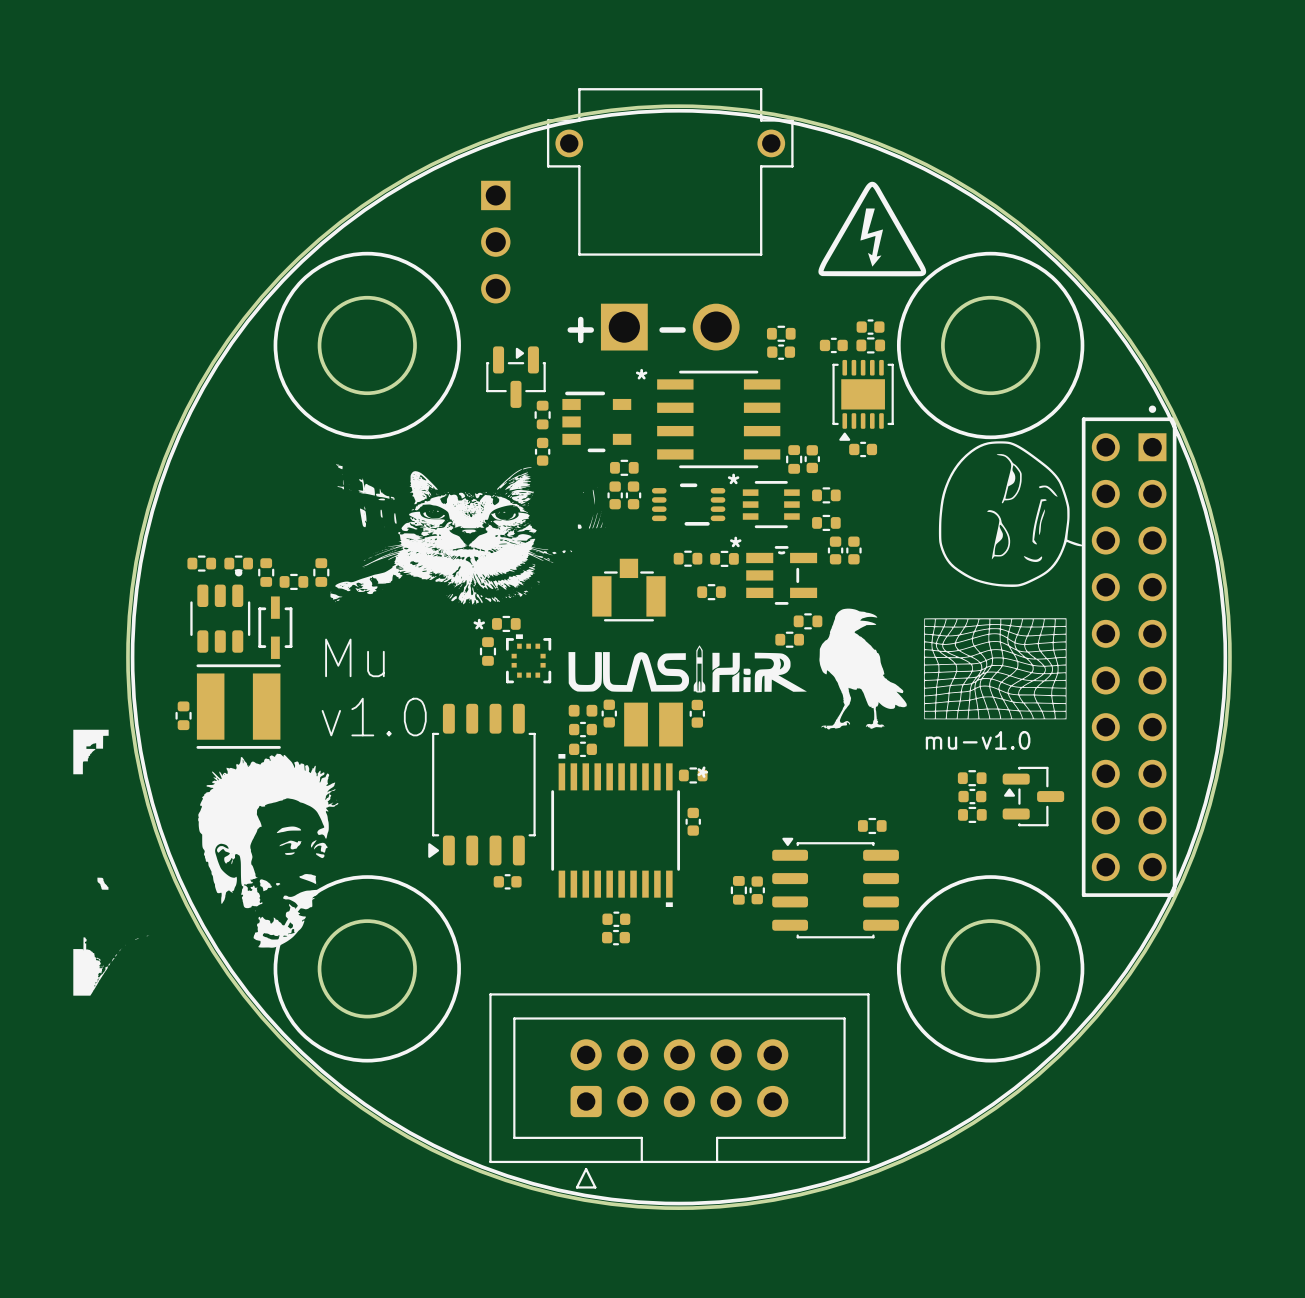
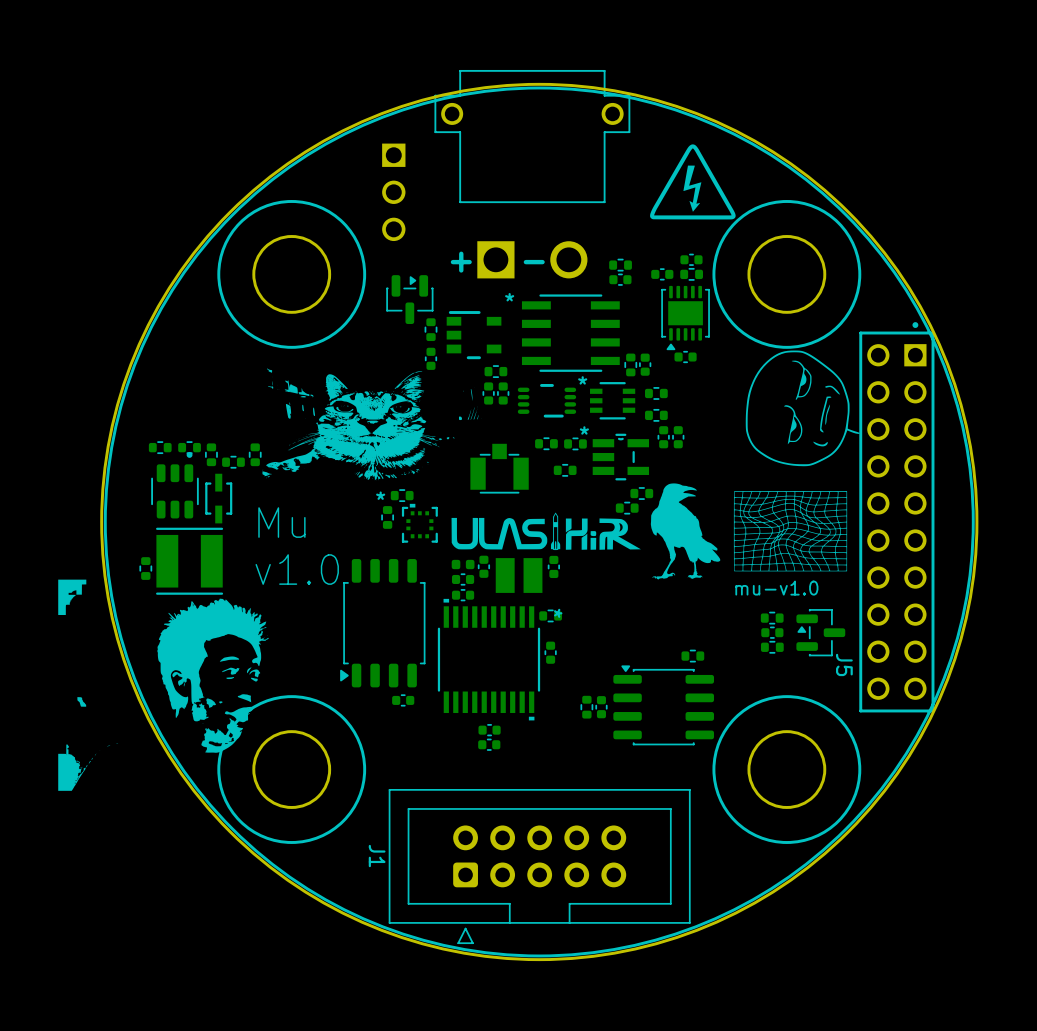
J5 name: none -> J5 (844, 664)
J1 name: none -> J1 (377, 856)

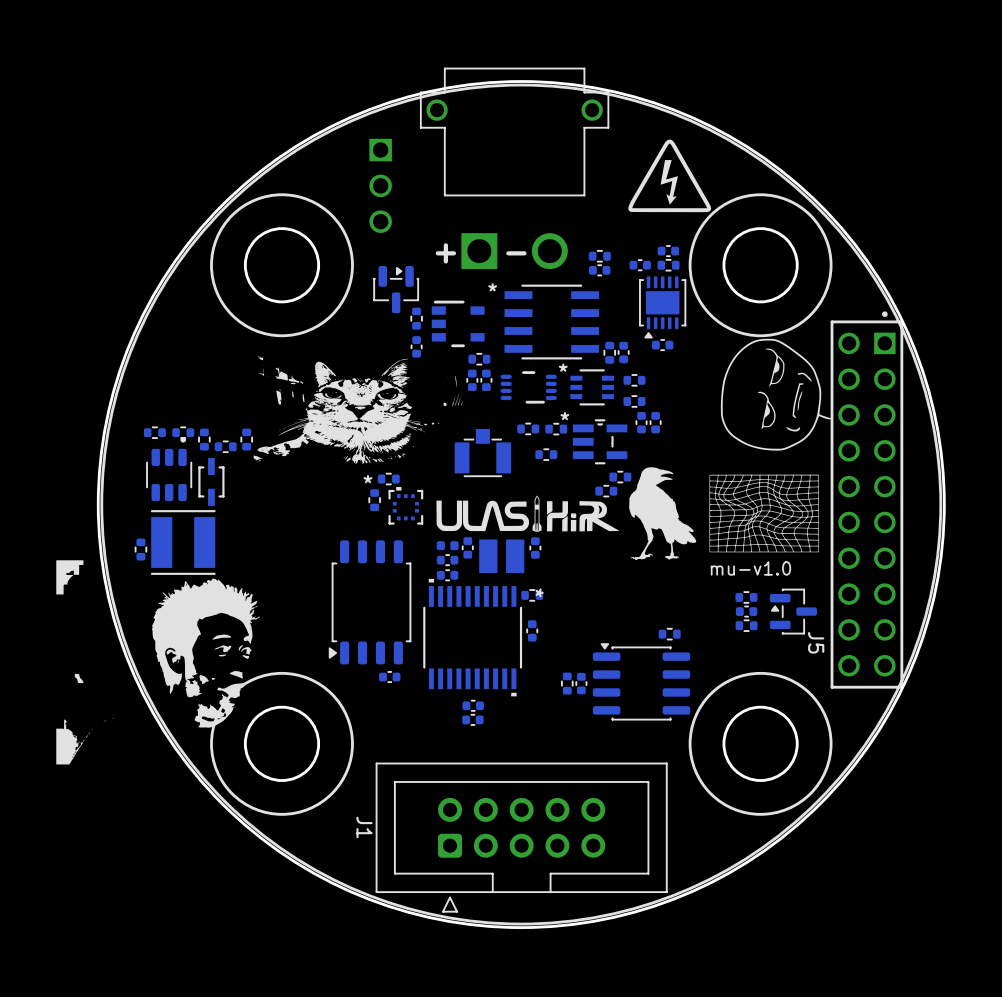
text: Mu (281, 522) -> none
text: v1.0 (297, 569) -> none

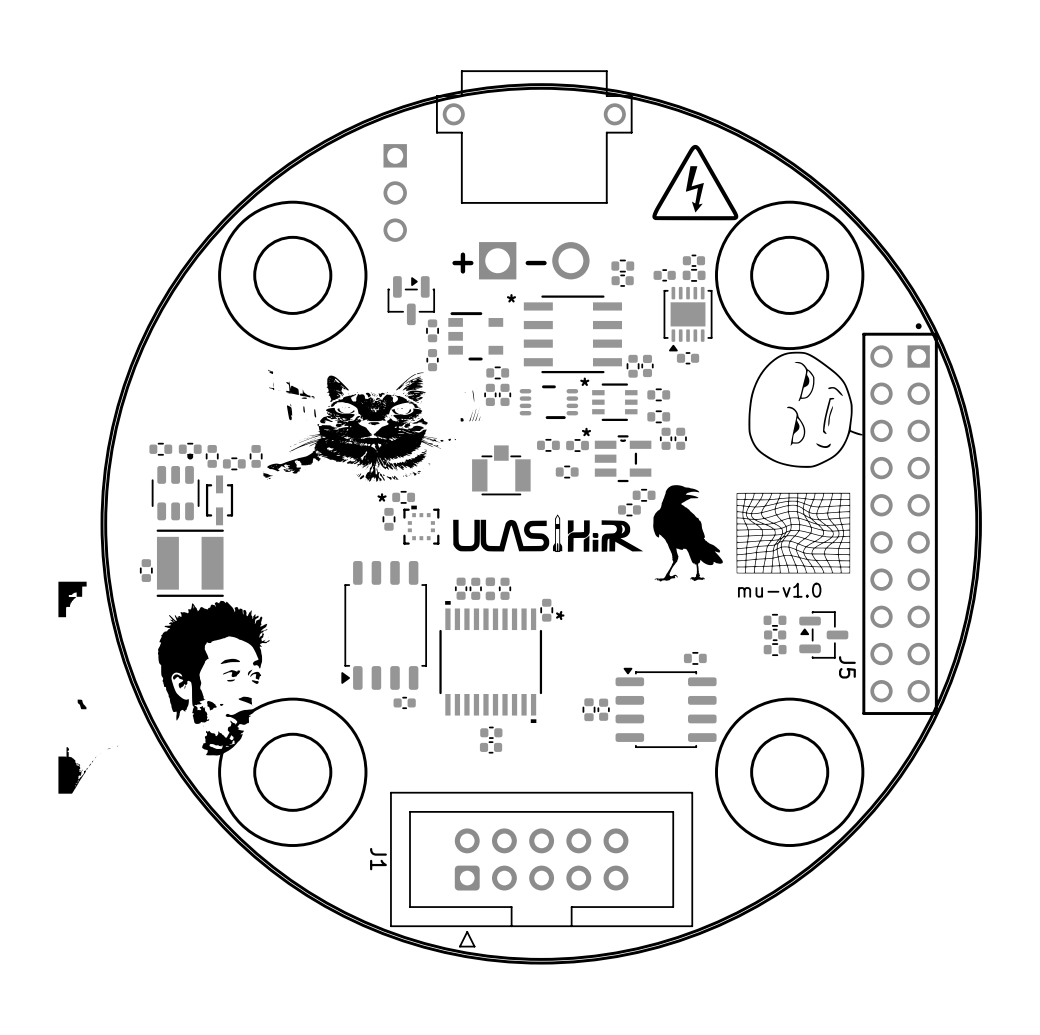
part rotation: 0° (447, 545) -> 90° clockwise (490, 588)
part position: (447, 545) -> (490, 588)
part: (467, 547) -> none
part: (535, 548) -> none
part: (501, 556) -> none
part: (447, 560) -> none
part: none -> (461, 588)
part: none -> (475, 588)
part: none -> (505, 588)
part: (447, 575) -> none
part rotation: 0° (532, 595) -> 90° clockwise (546, 610)
part: (532, 630) -> none

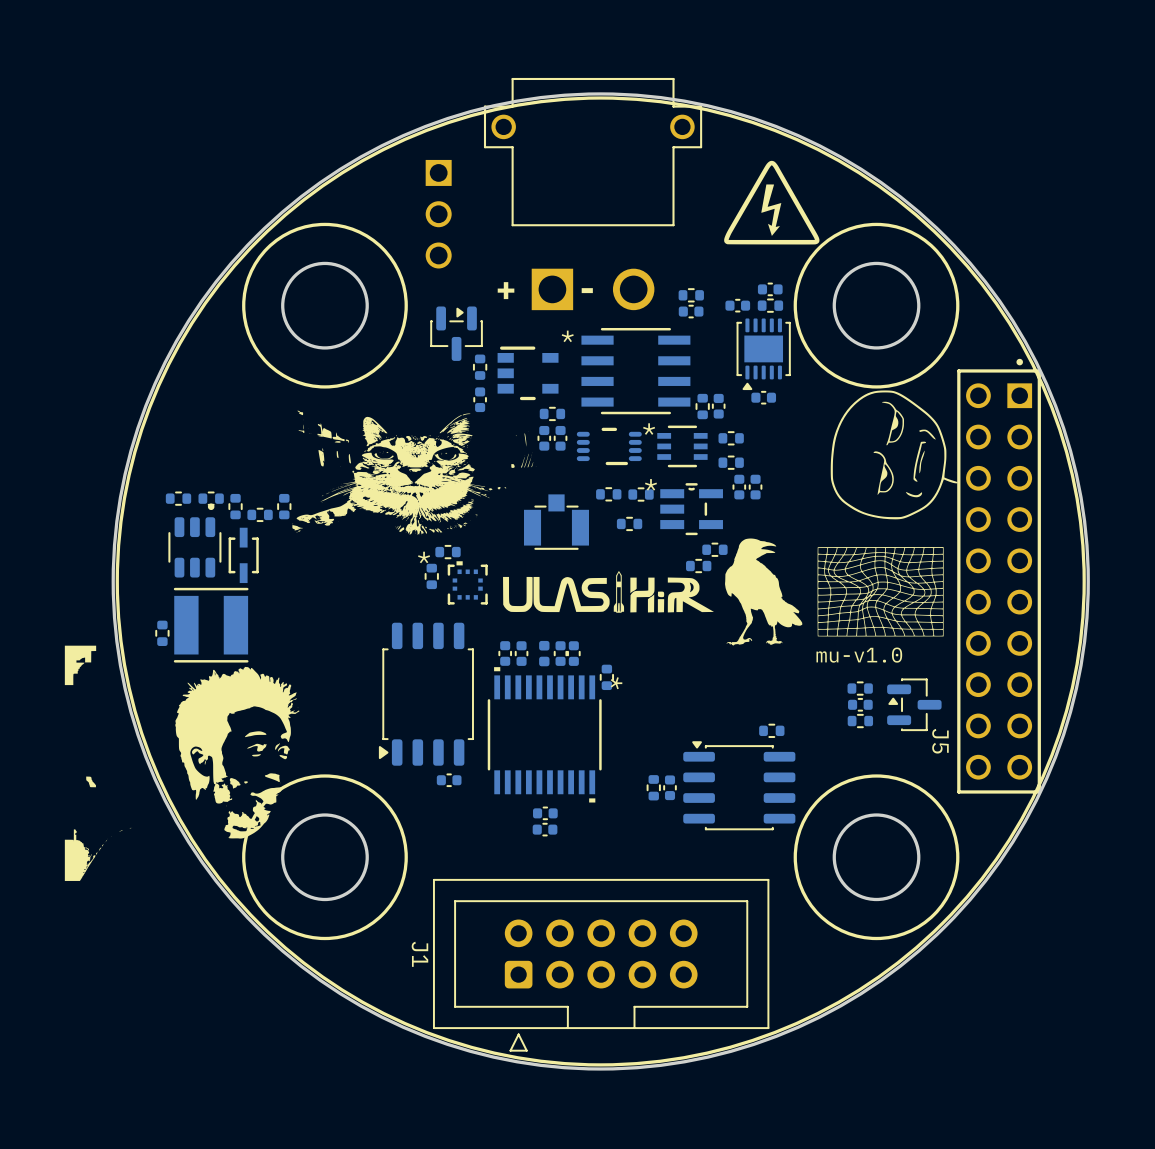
part: none -> (505, 653)
part: (461, 588) -> none
part: none -> (521, 653)
part: (475, 588) -> none
part: none -> (573, 653)

